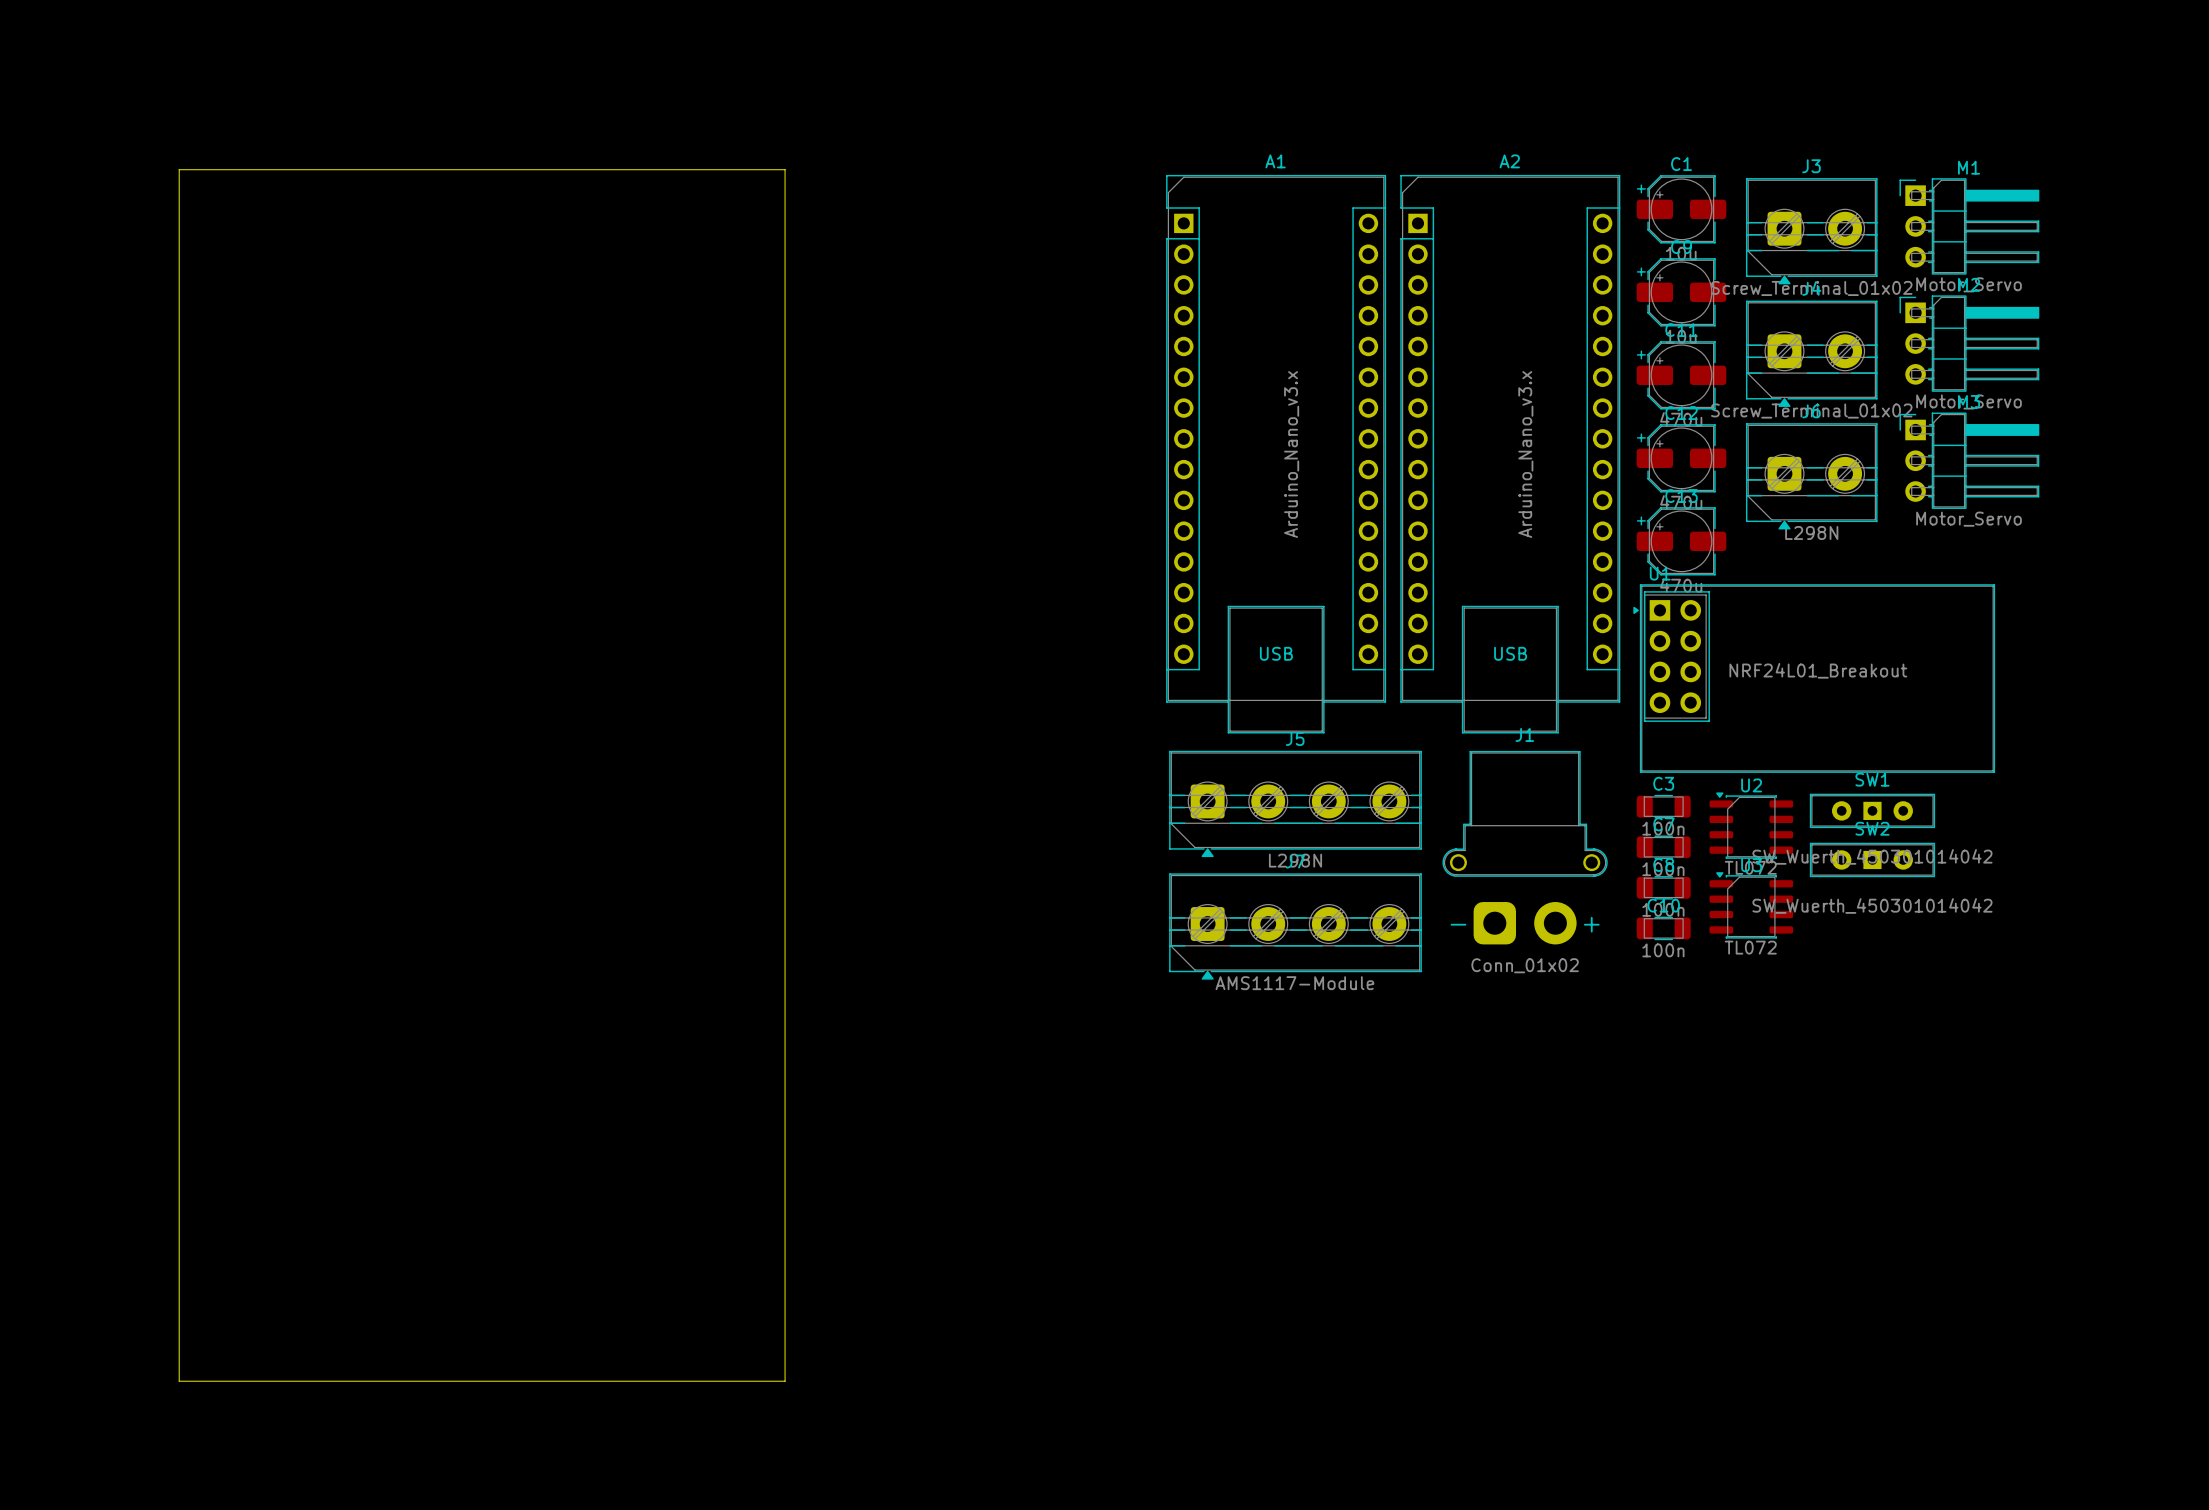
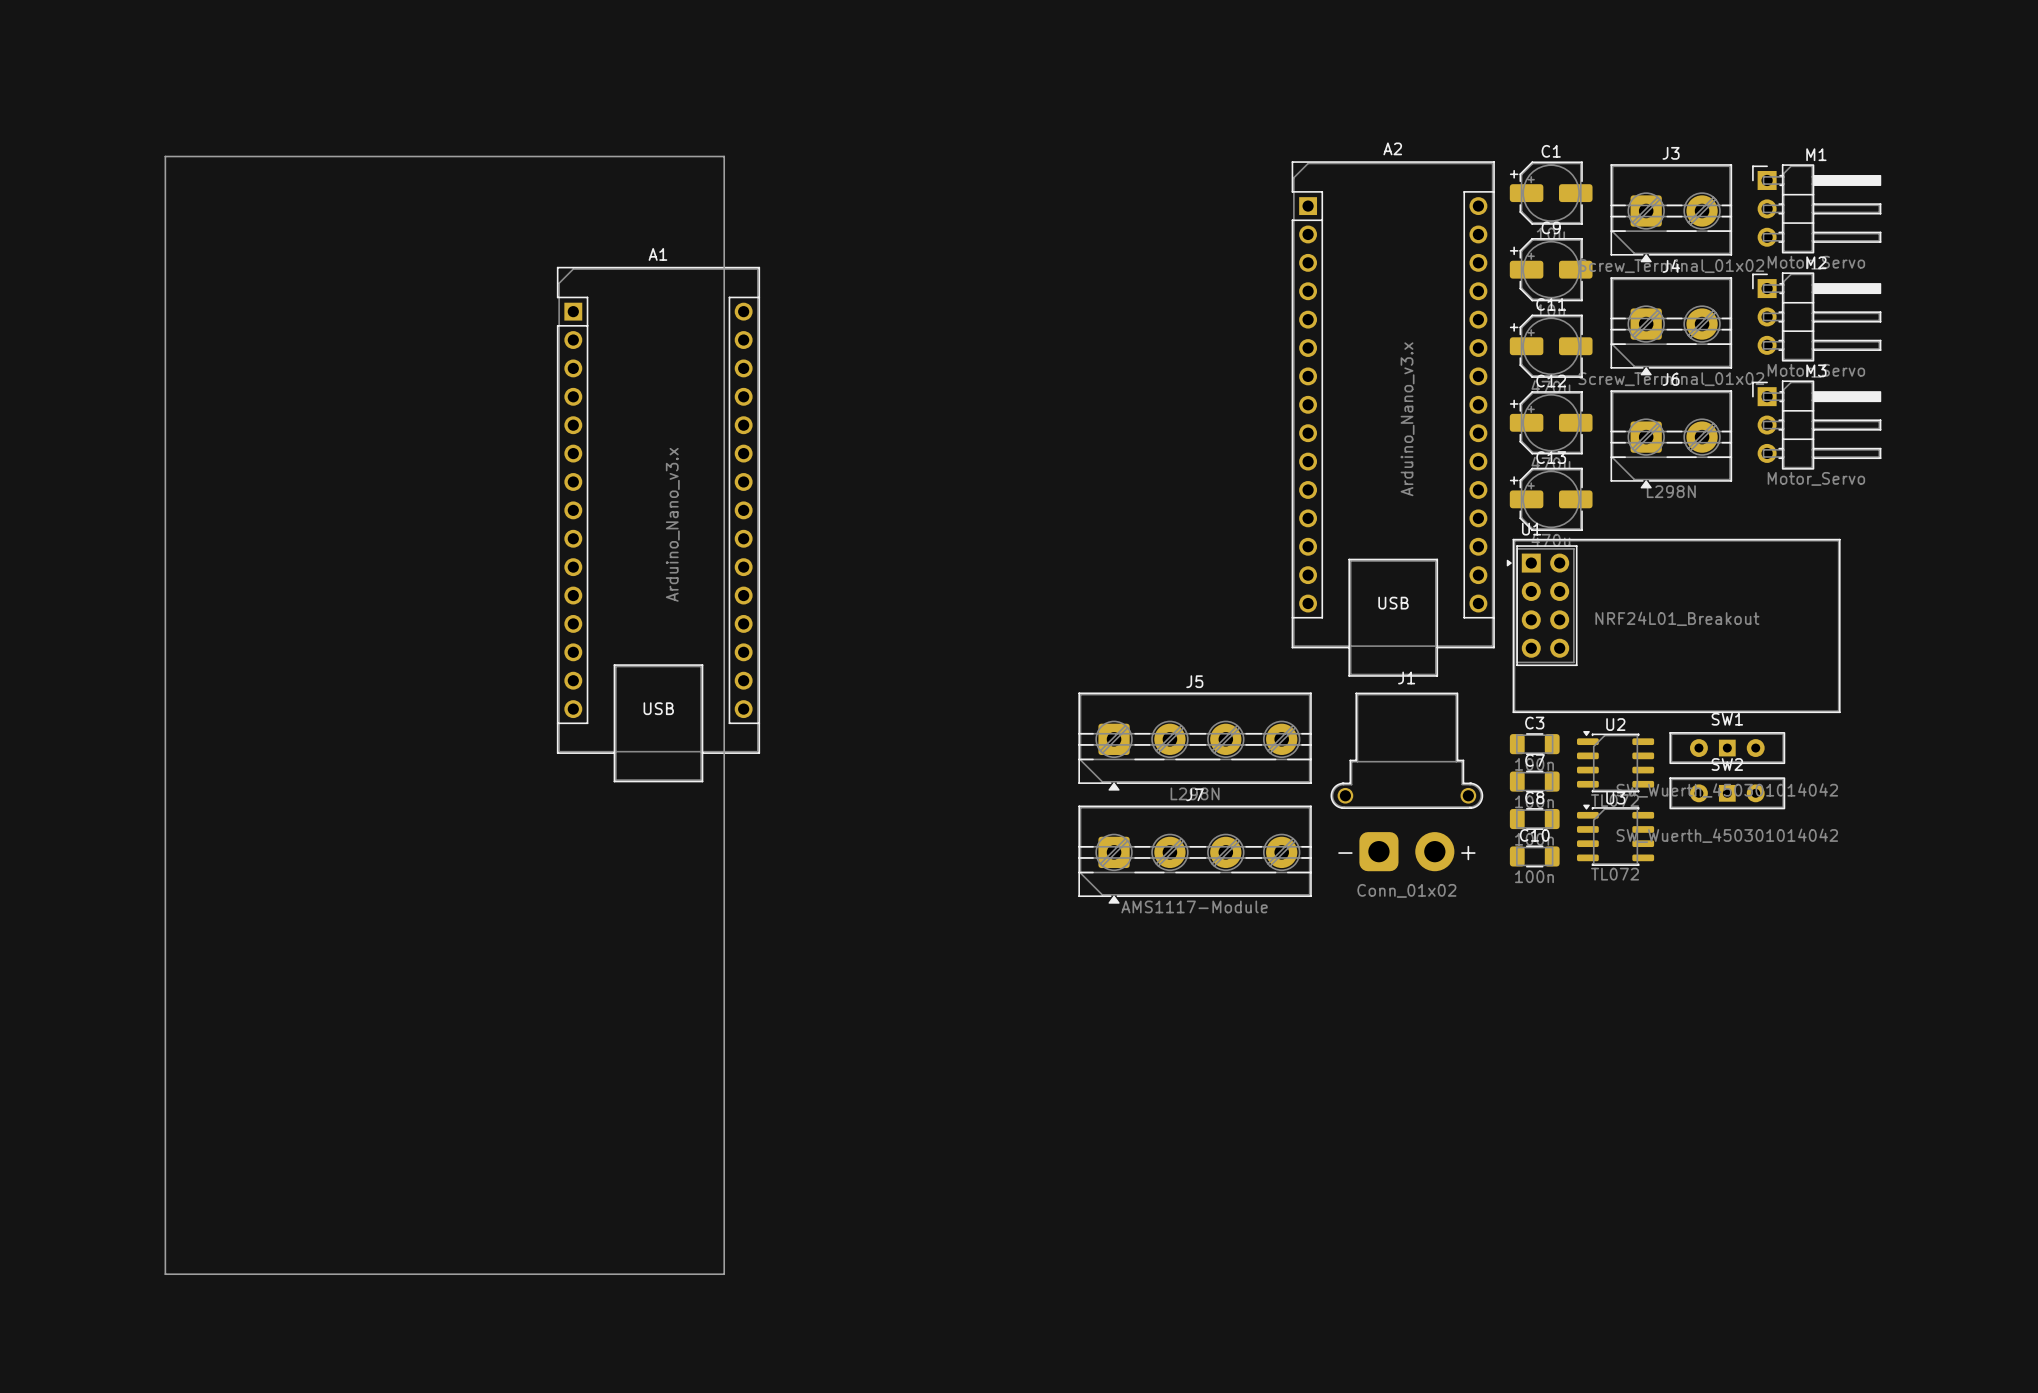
A1 position: (1276, 454) -> (658, 524)

